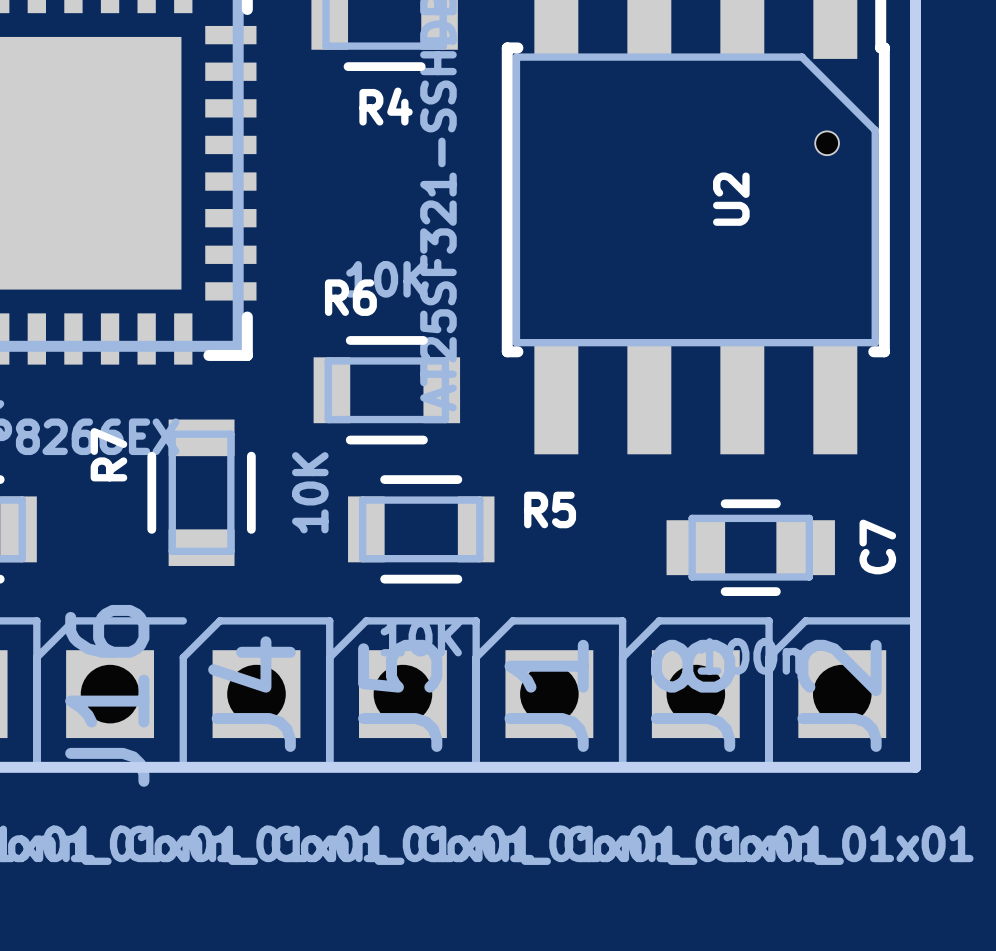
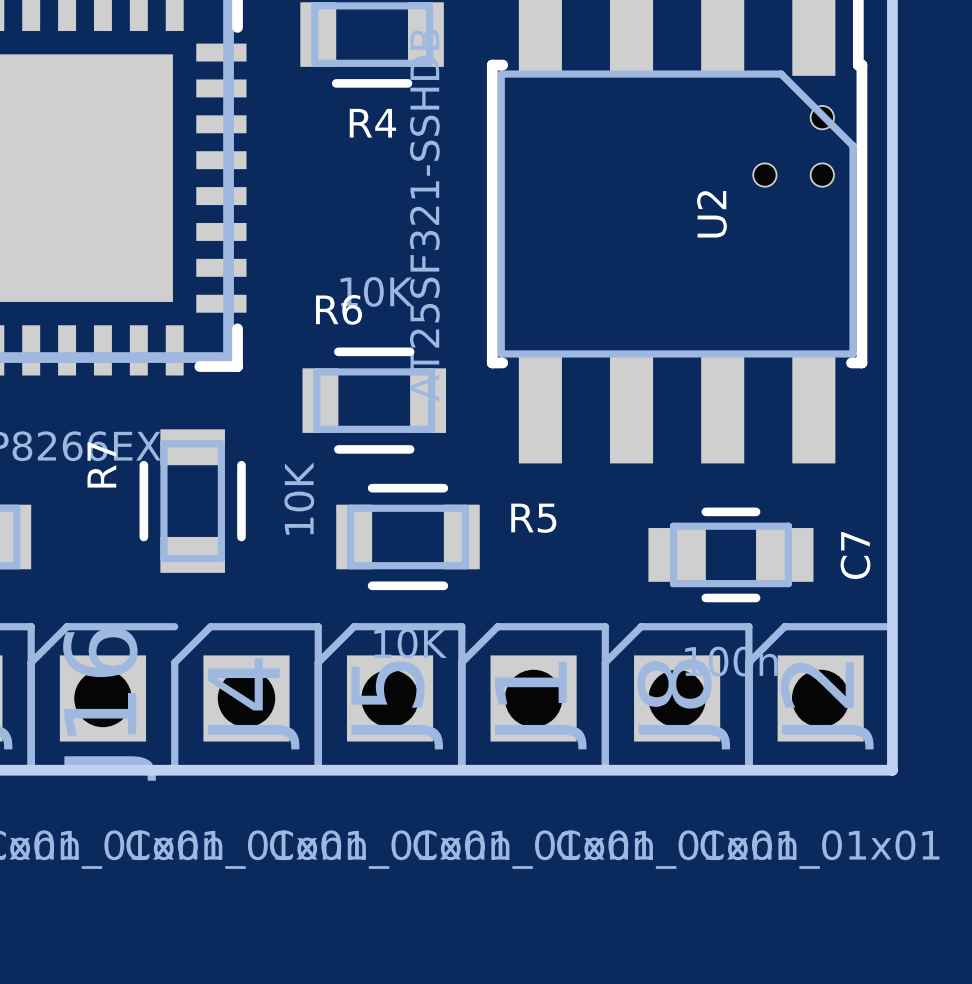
part: none -> (822, 117)
part: (827, 143) -> none
part: none -> (764, 175)
part: none -> (822, 175)

